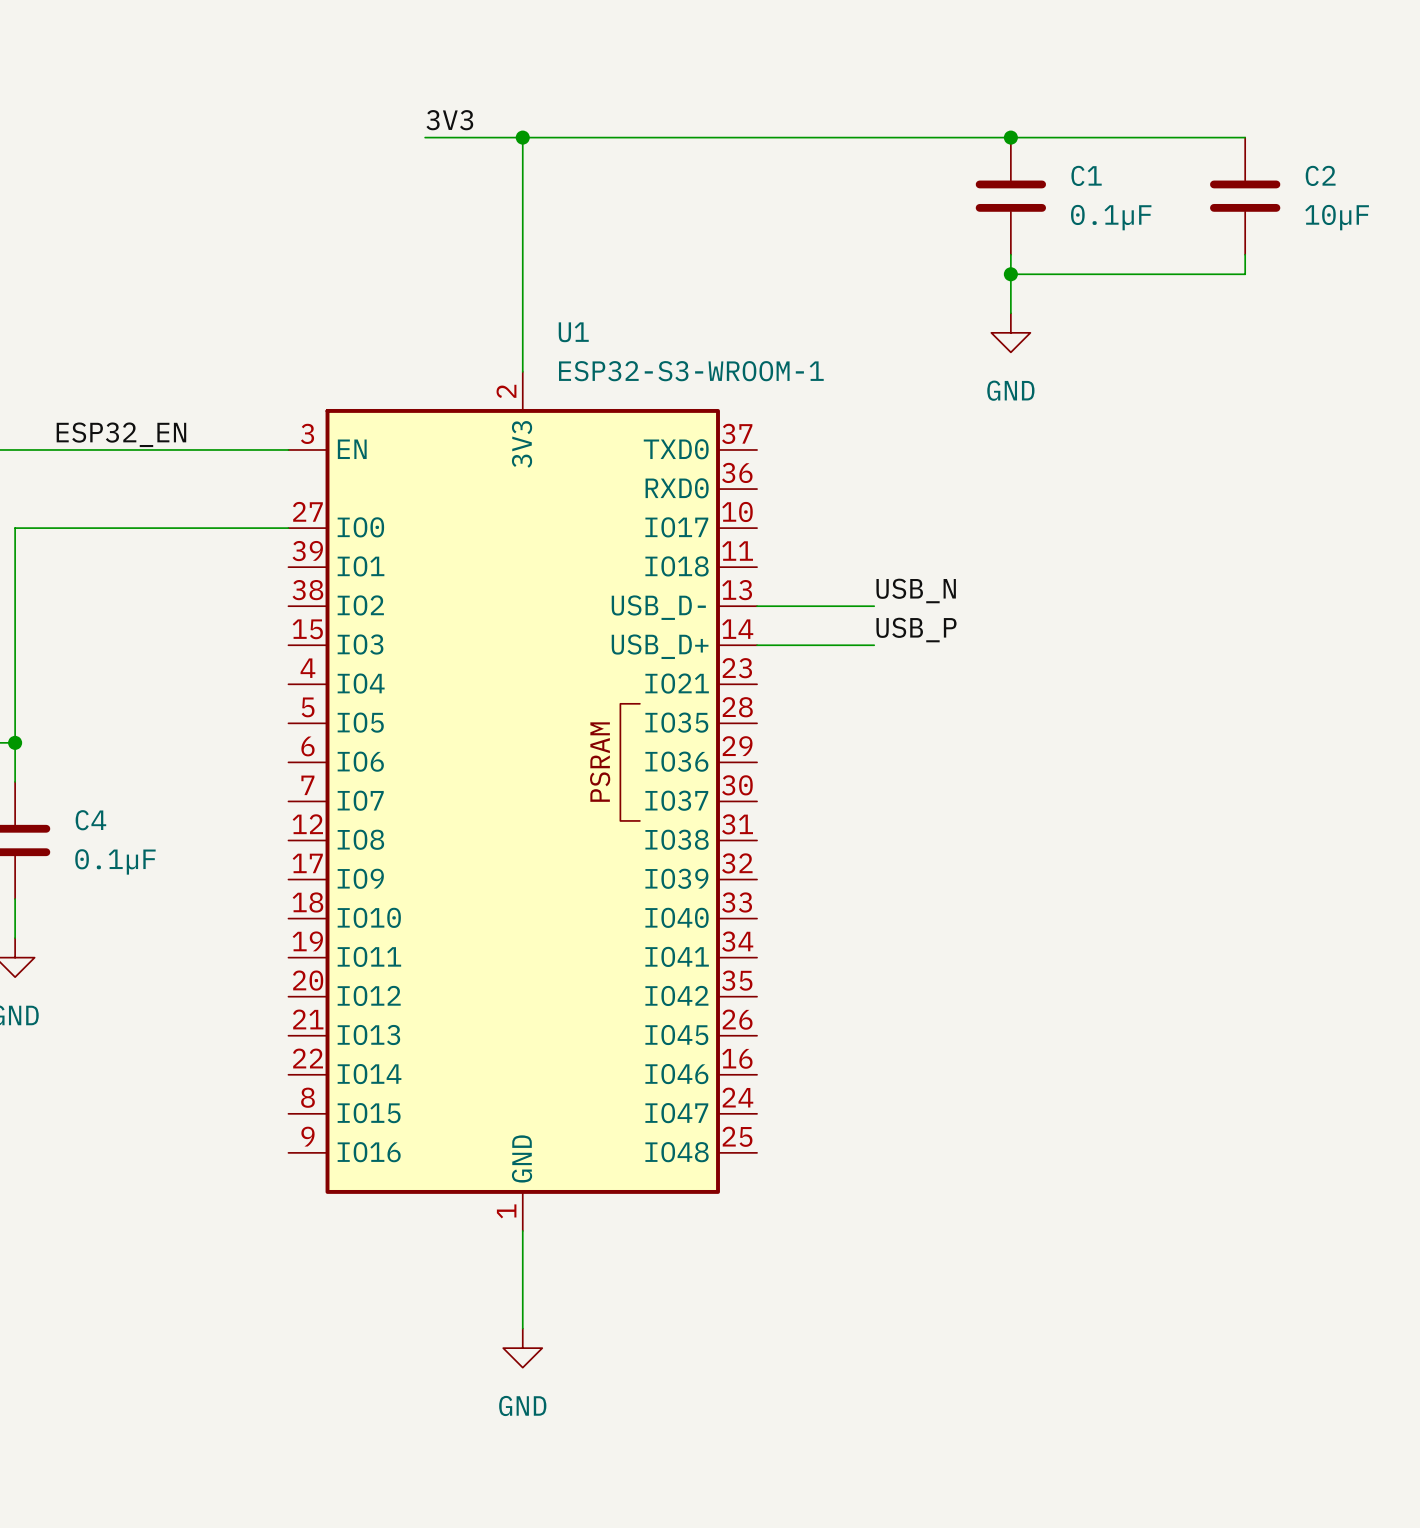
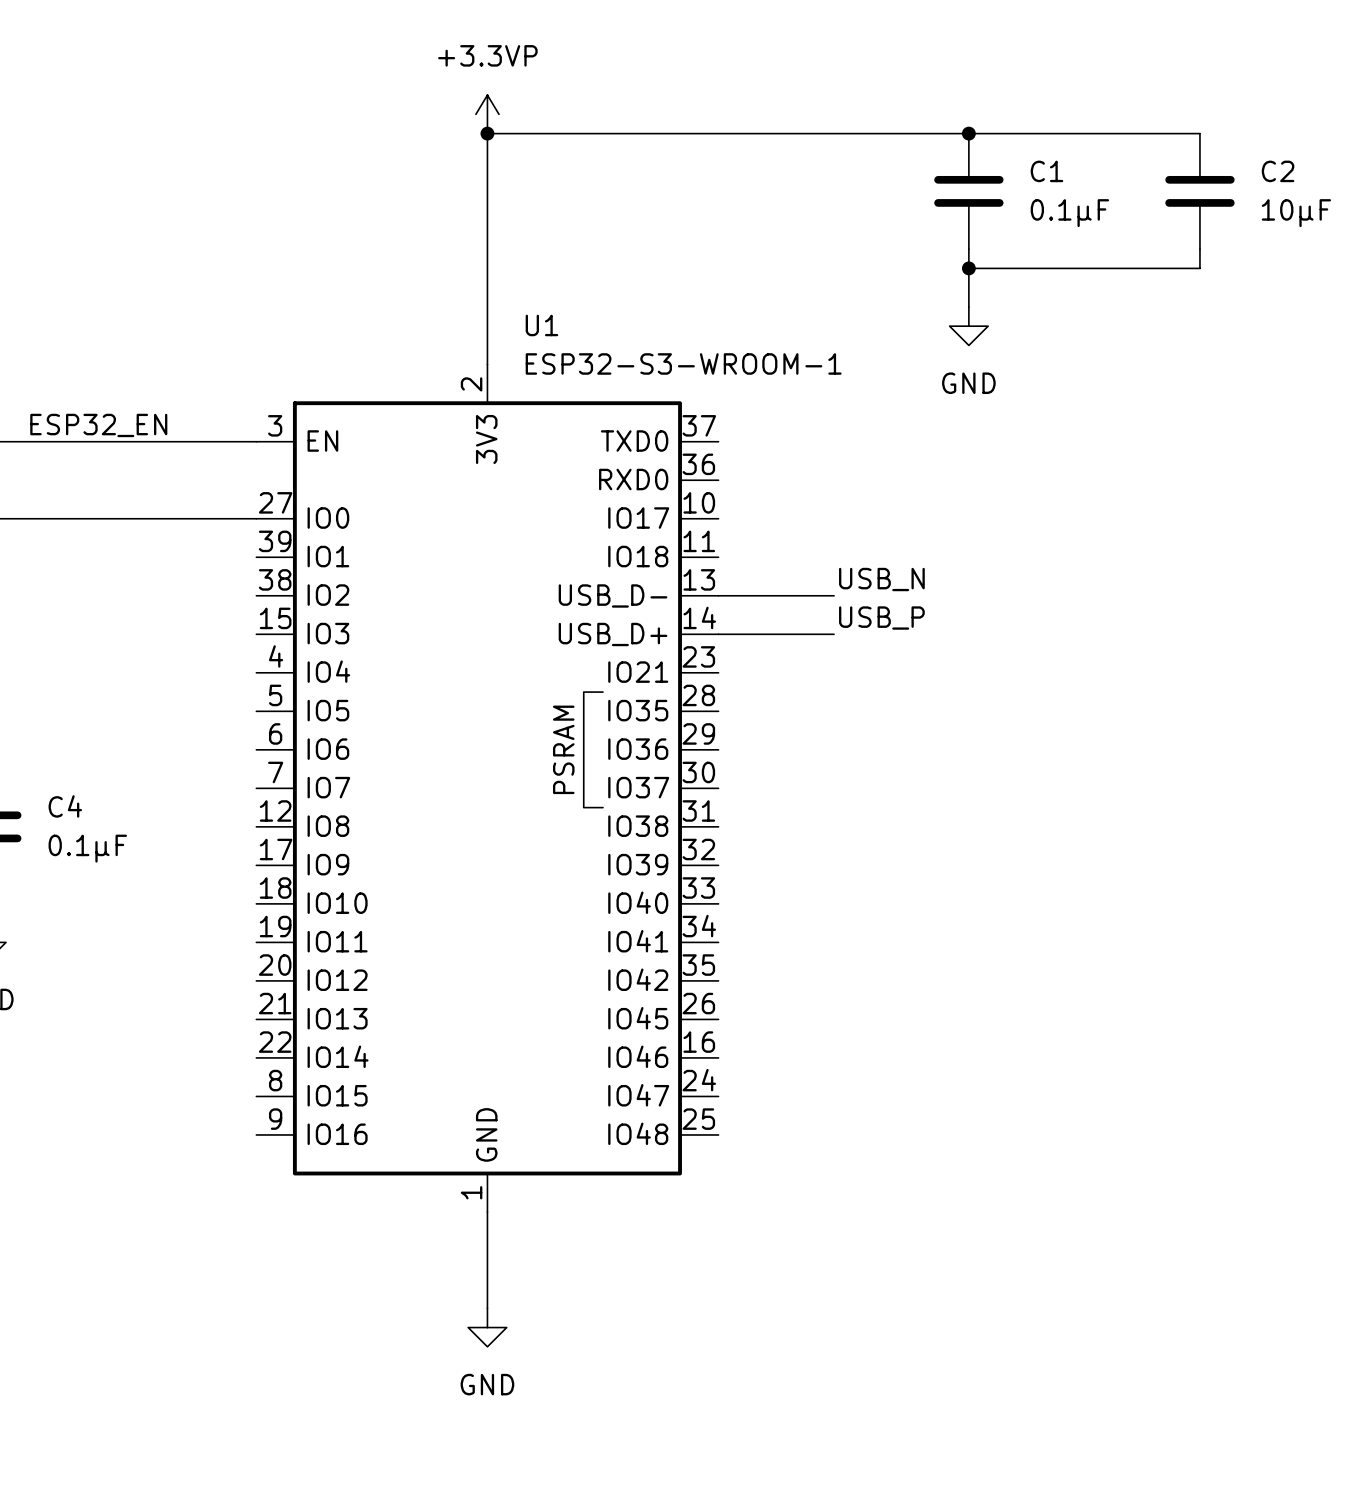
power symbol: none -> +3.3VP (487, 114)
label: 3V3 (449, 120) -> none
wire: (425, 137) (522, 137) -> none

